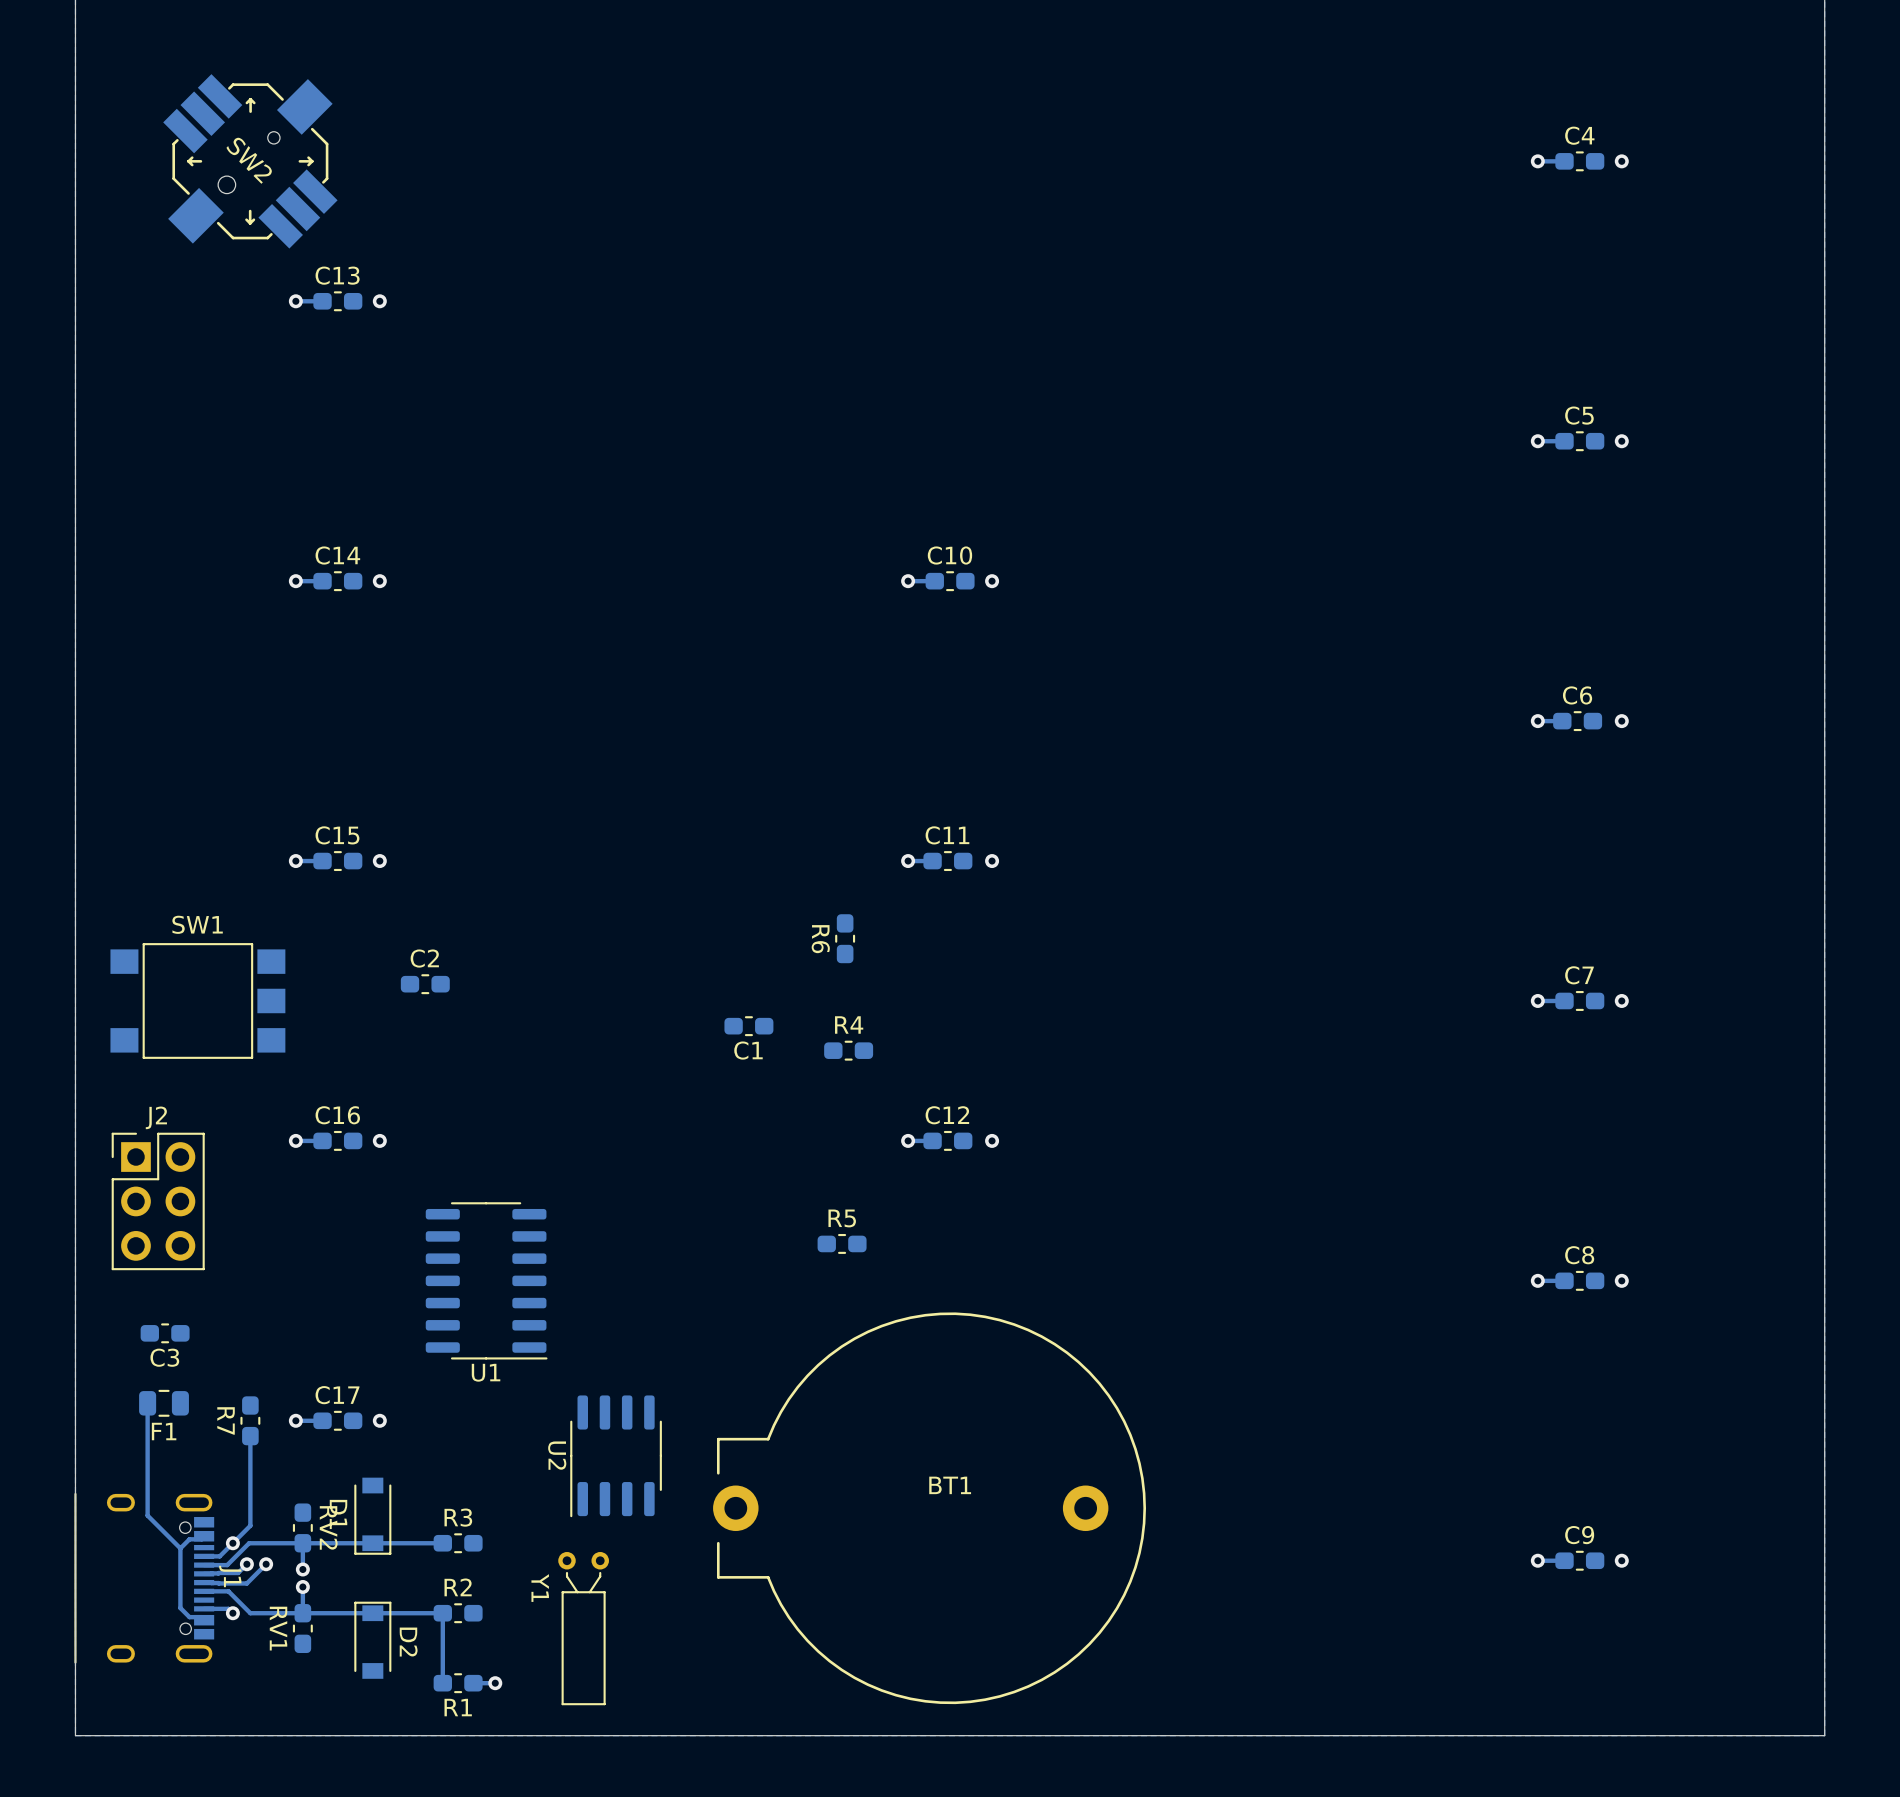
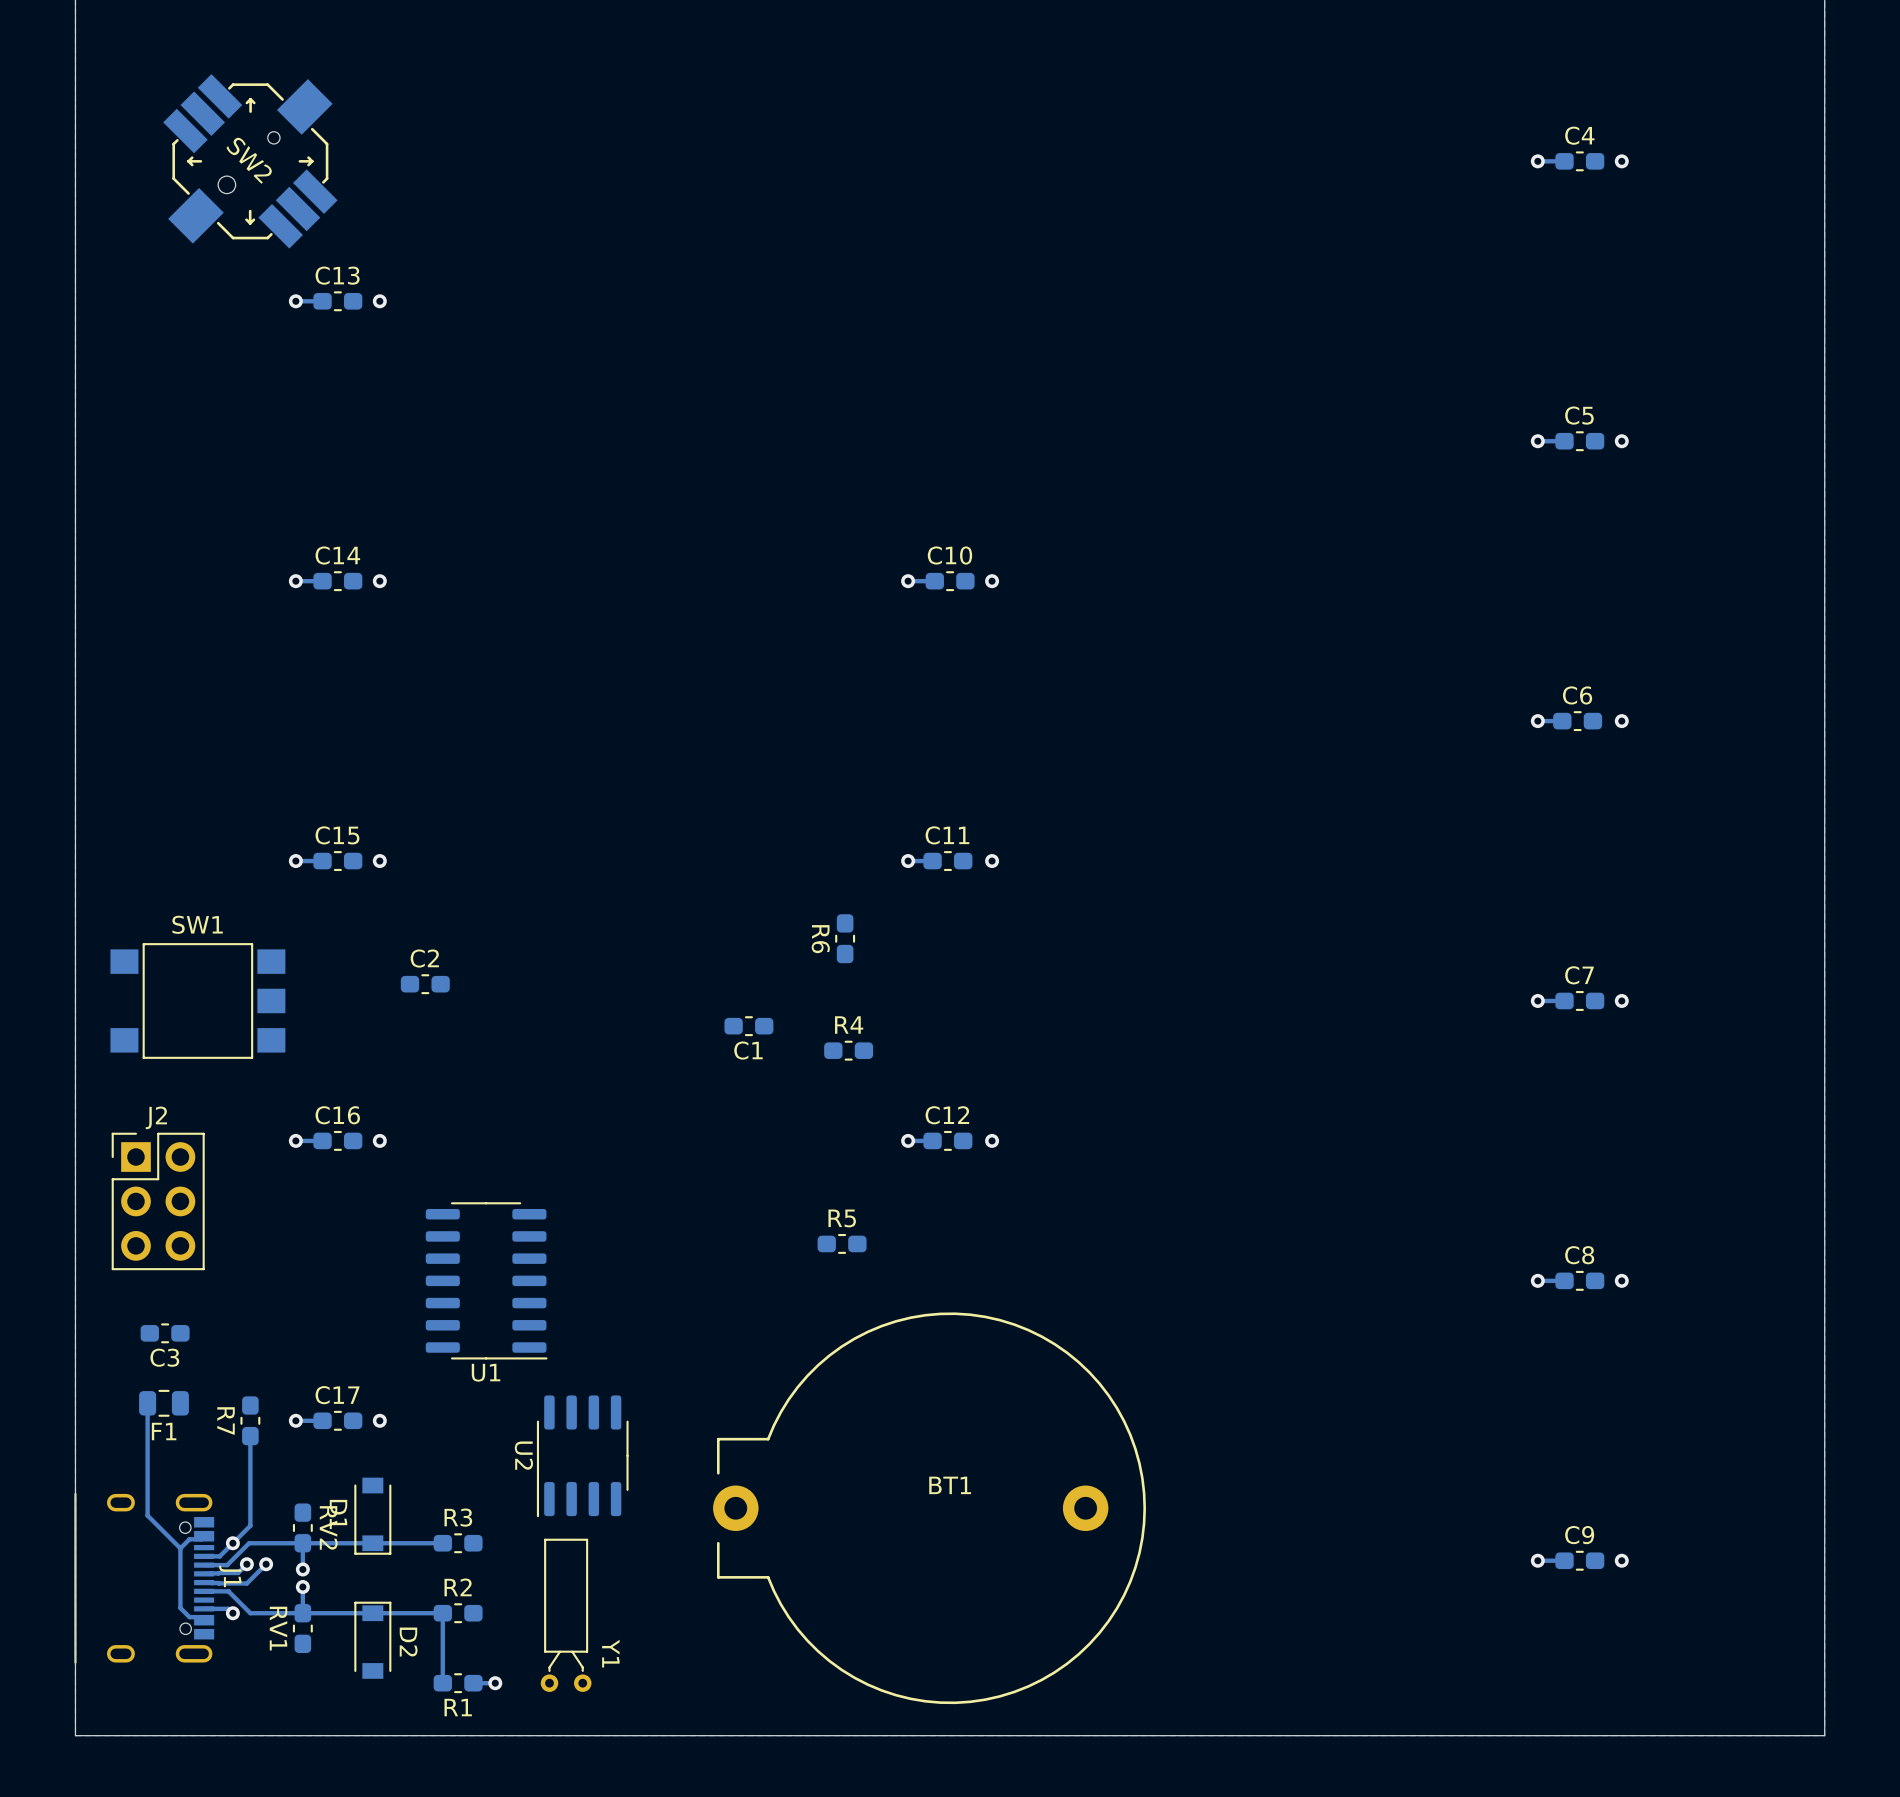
U2 position: (616, 1456) -> (582, 1456)
Y1 rotation: 0° (583, 1628) -> 180° (566, 1615)

